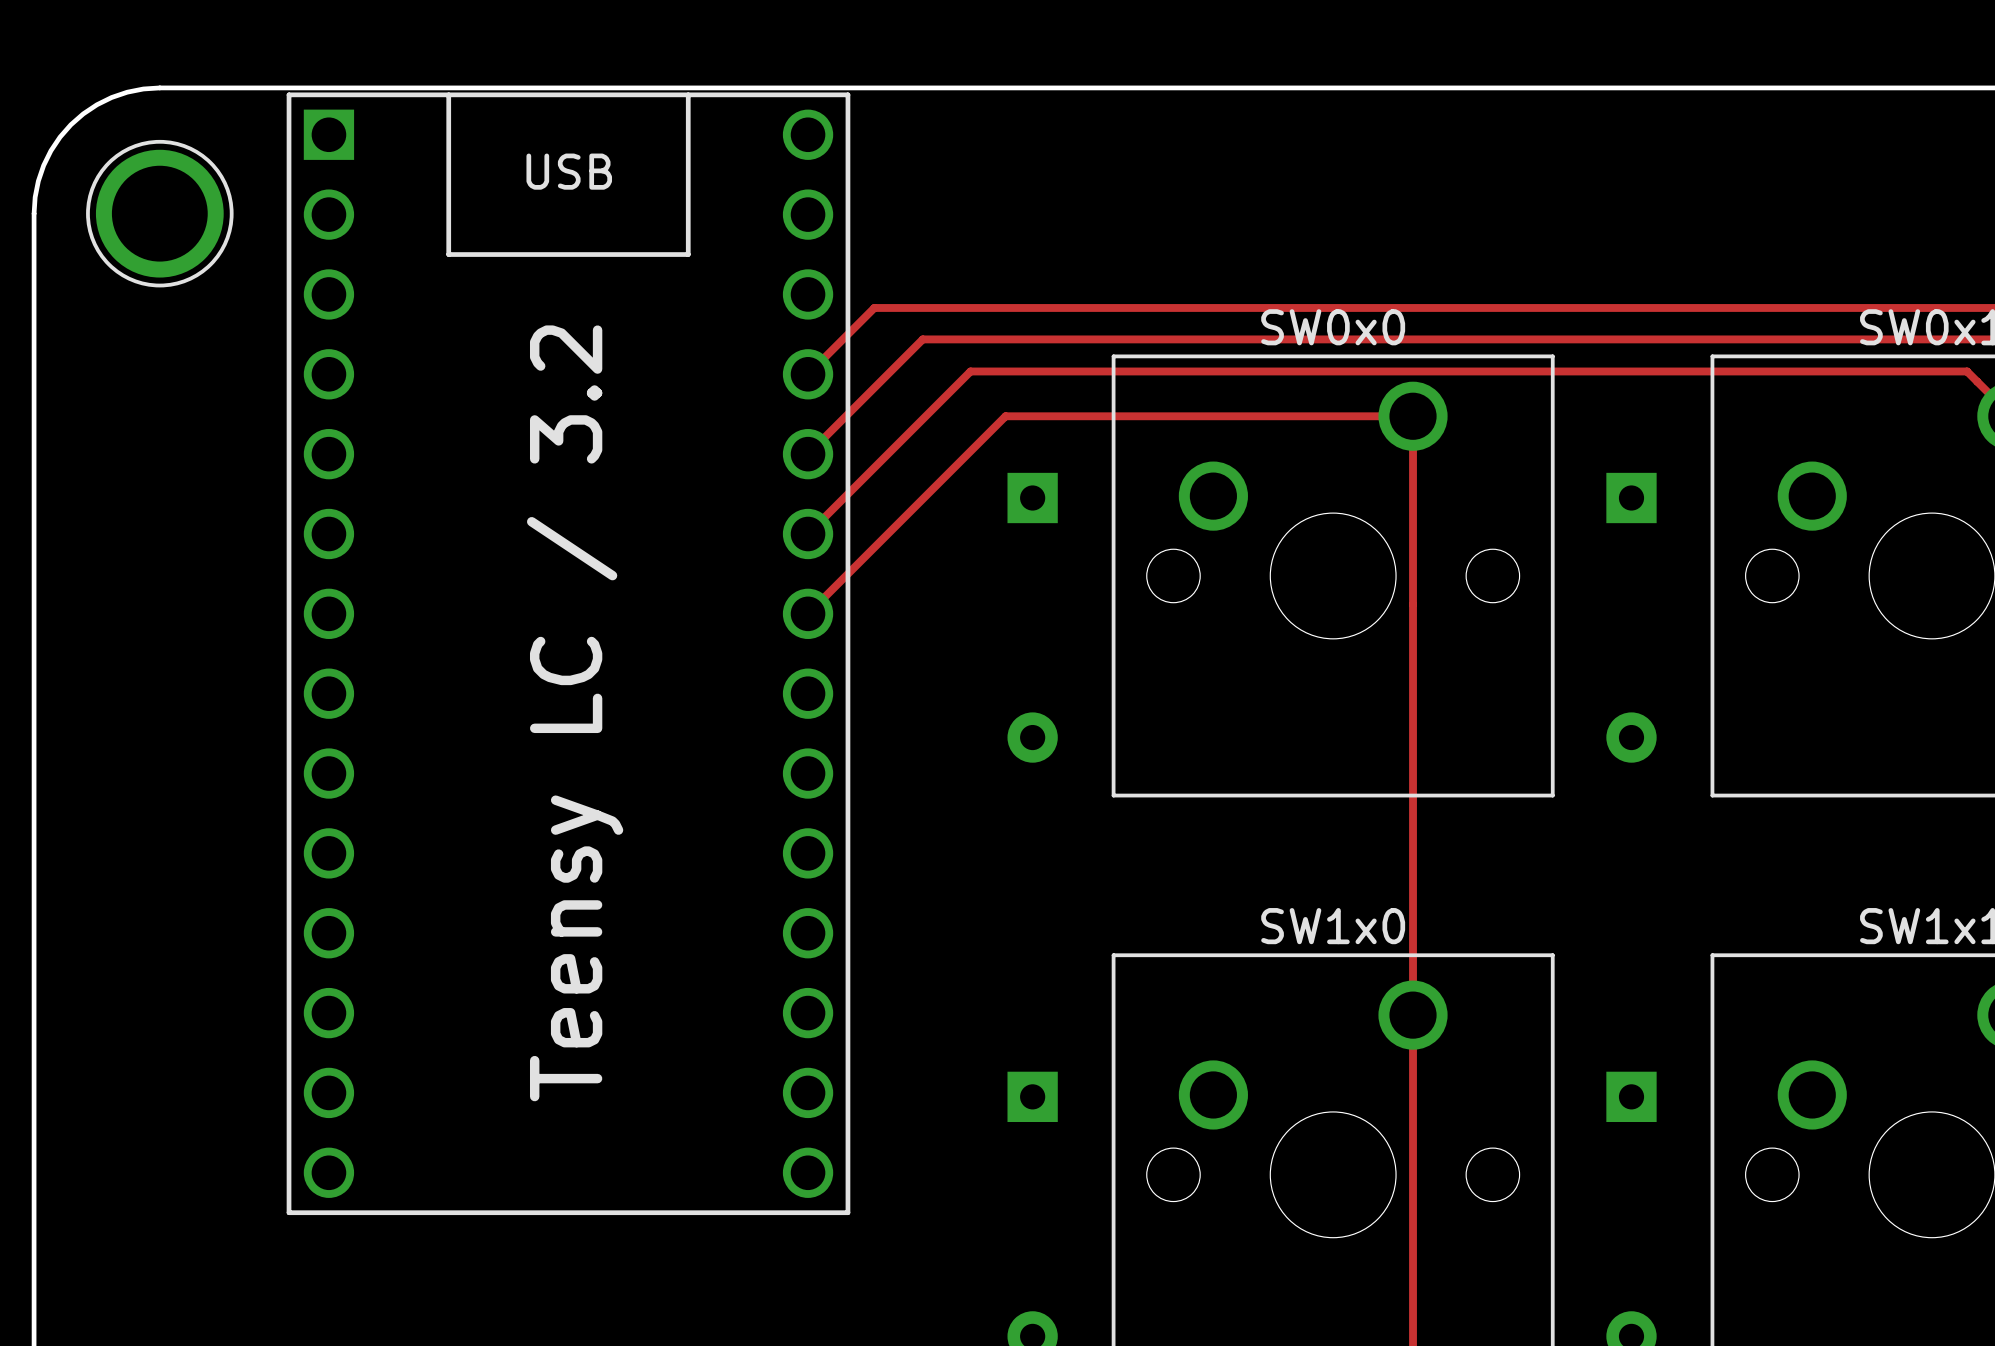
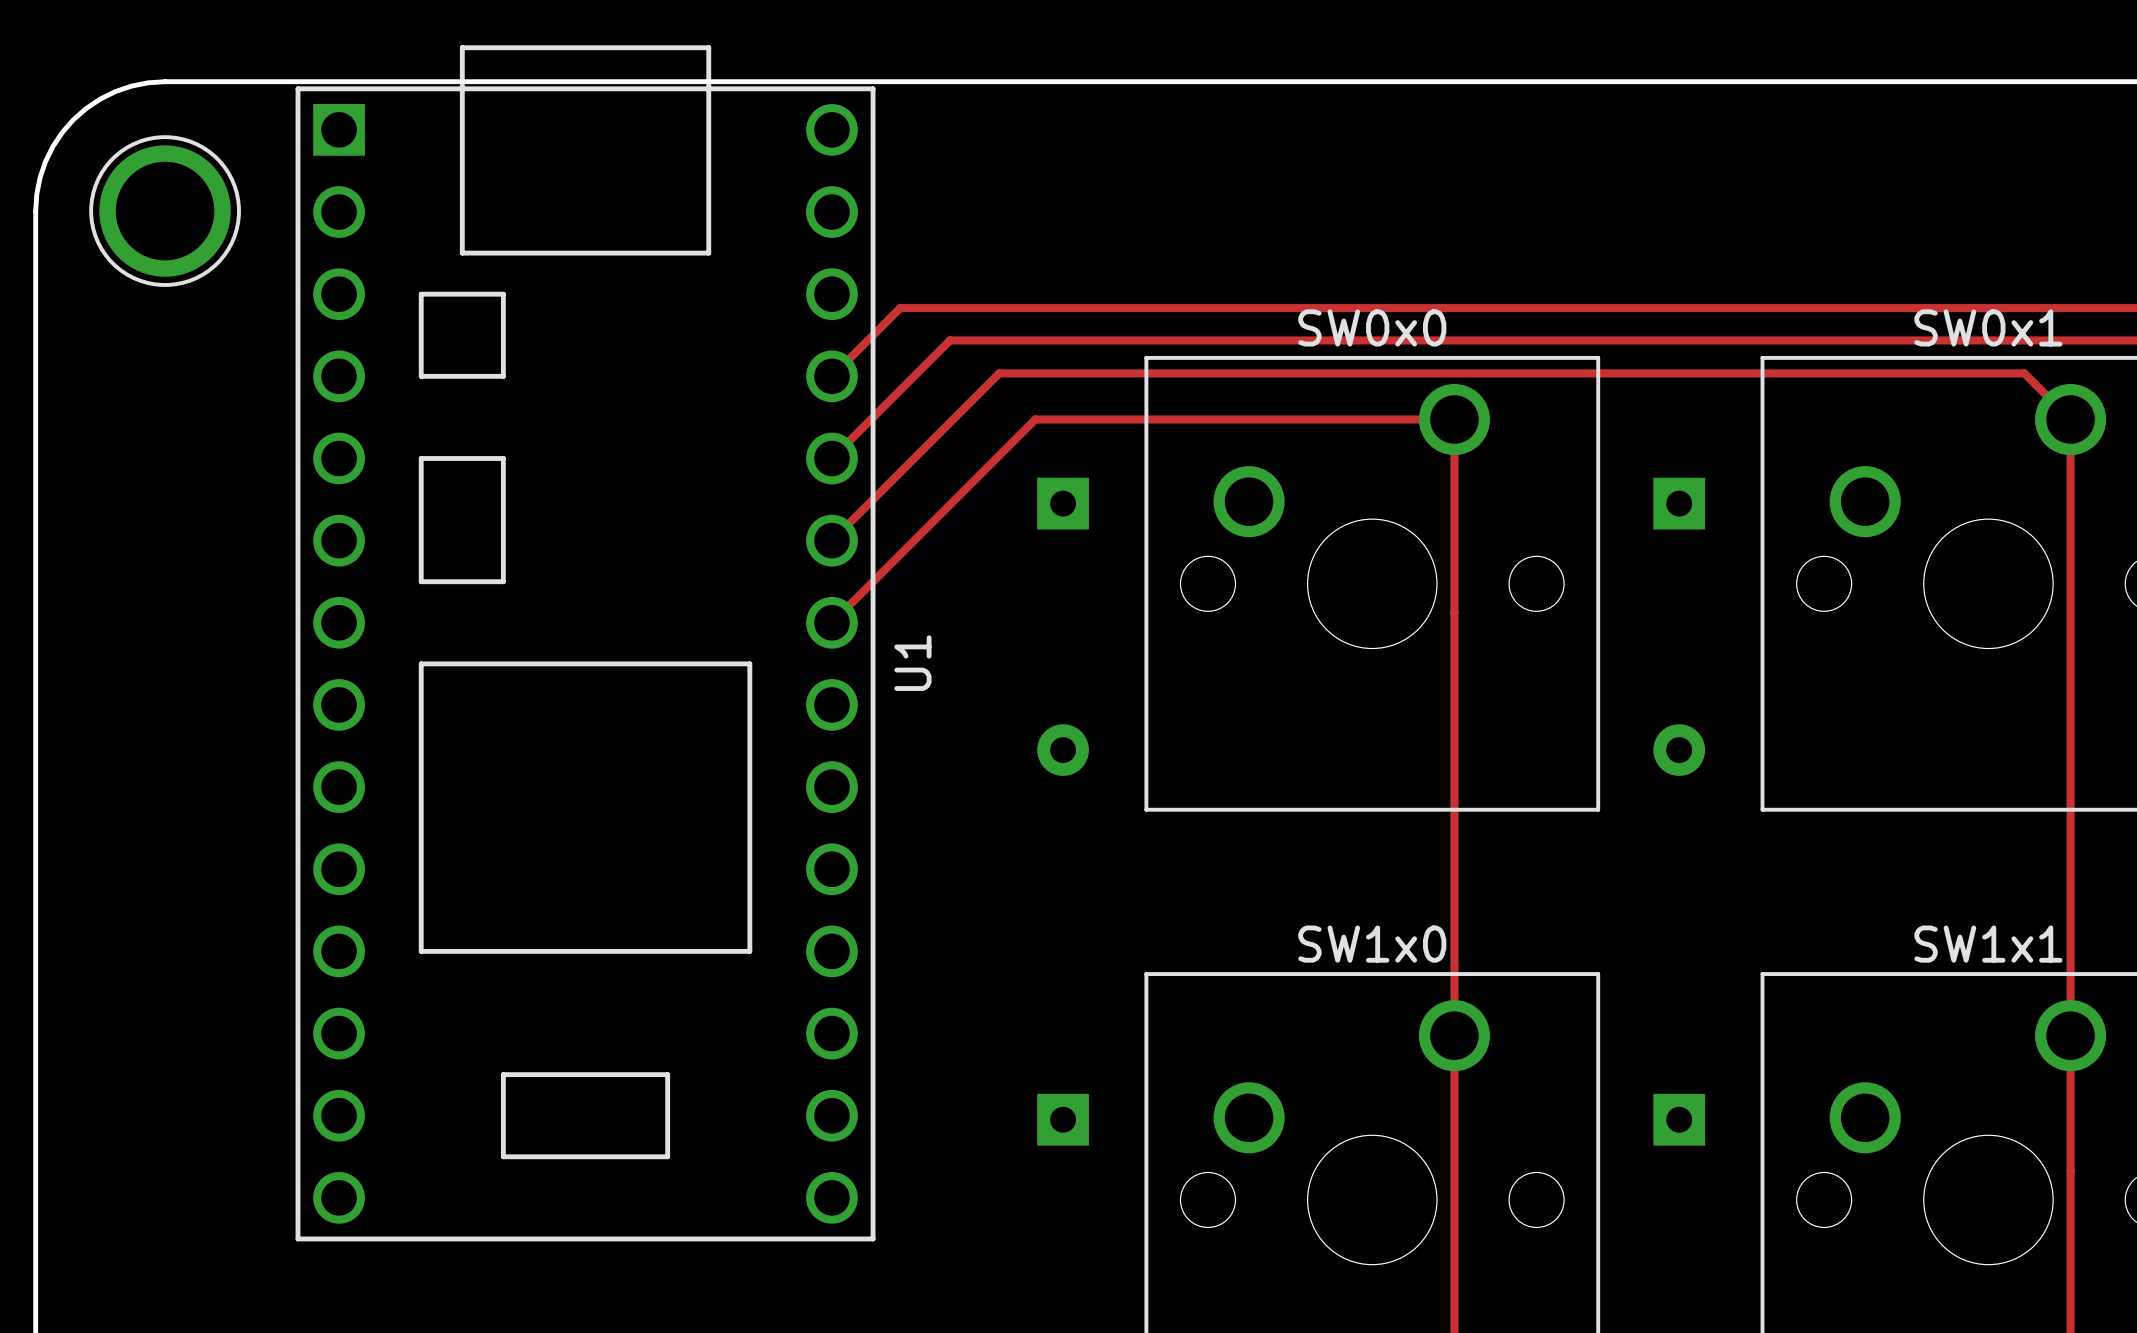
U1: none -> (585, 643)
part: (568, 653) -> none

